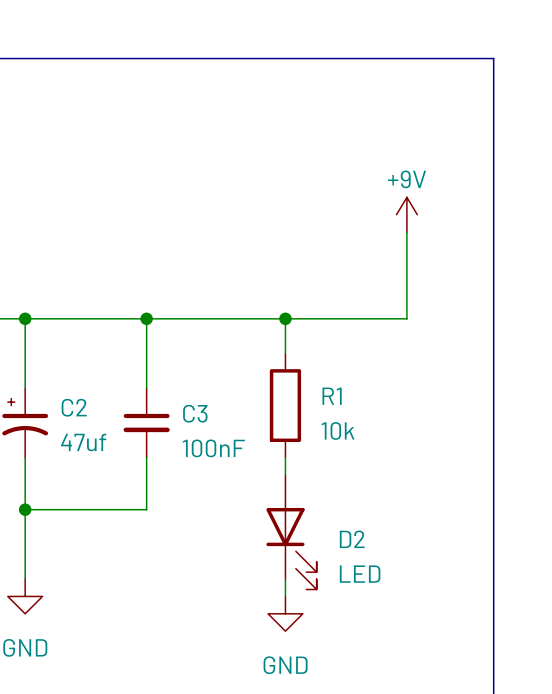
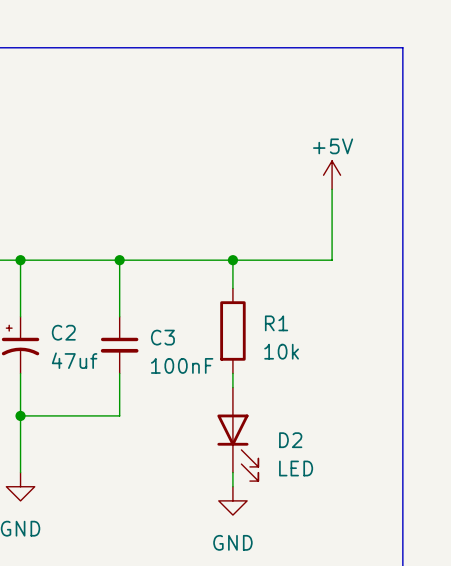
power symbol: +9V (406, 214) -> +5V (332, 175)

